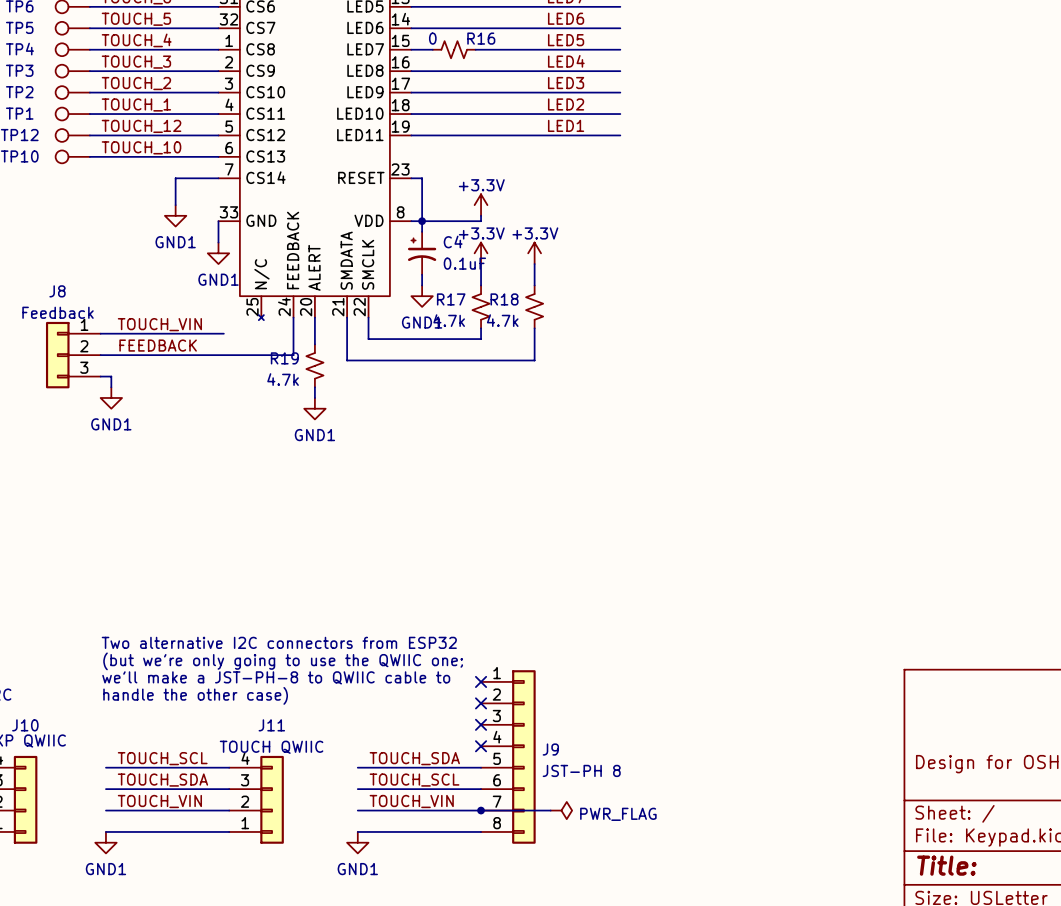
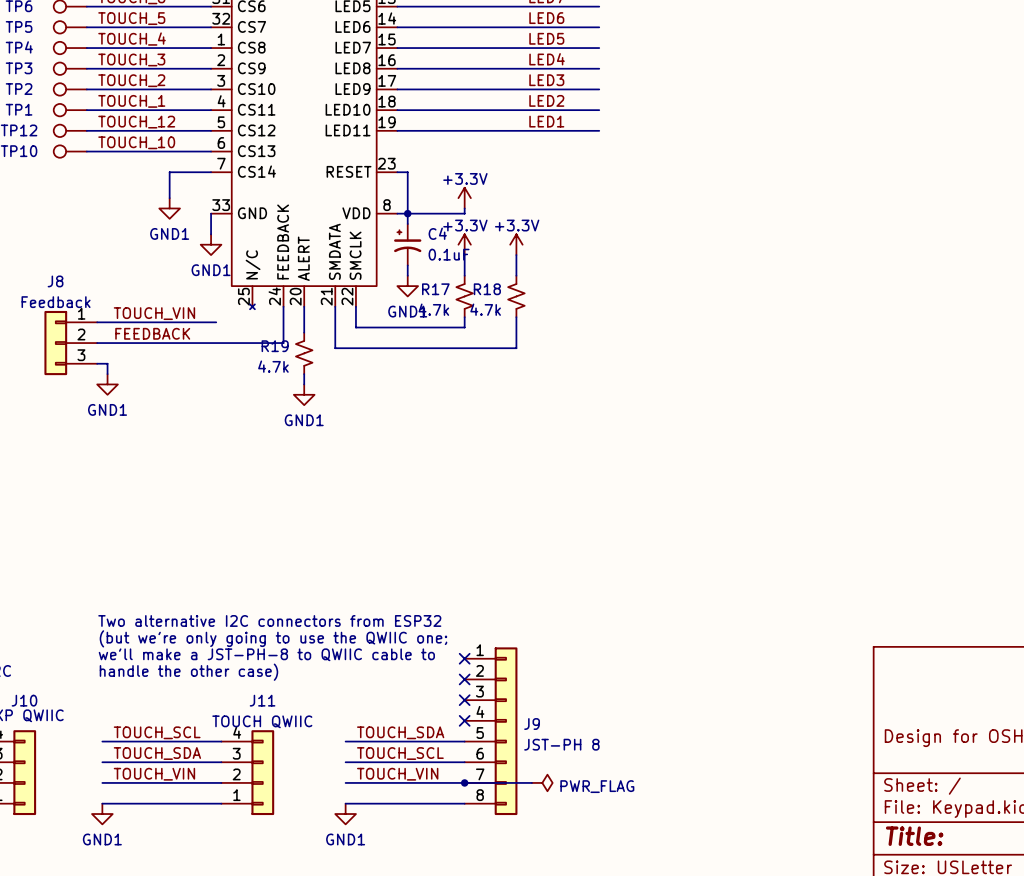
R16: 0 (454, 49) -> none

